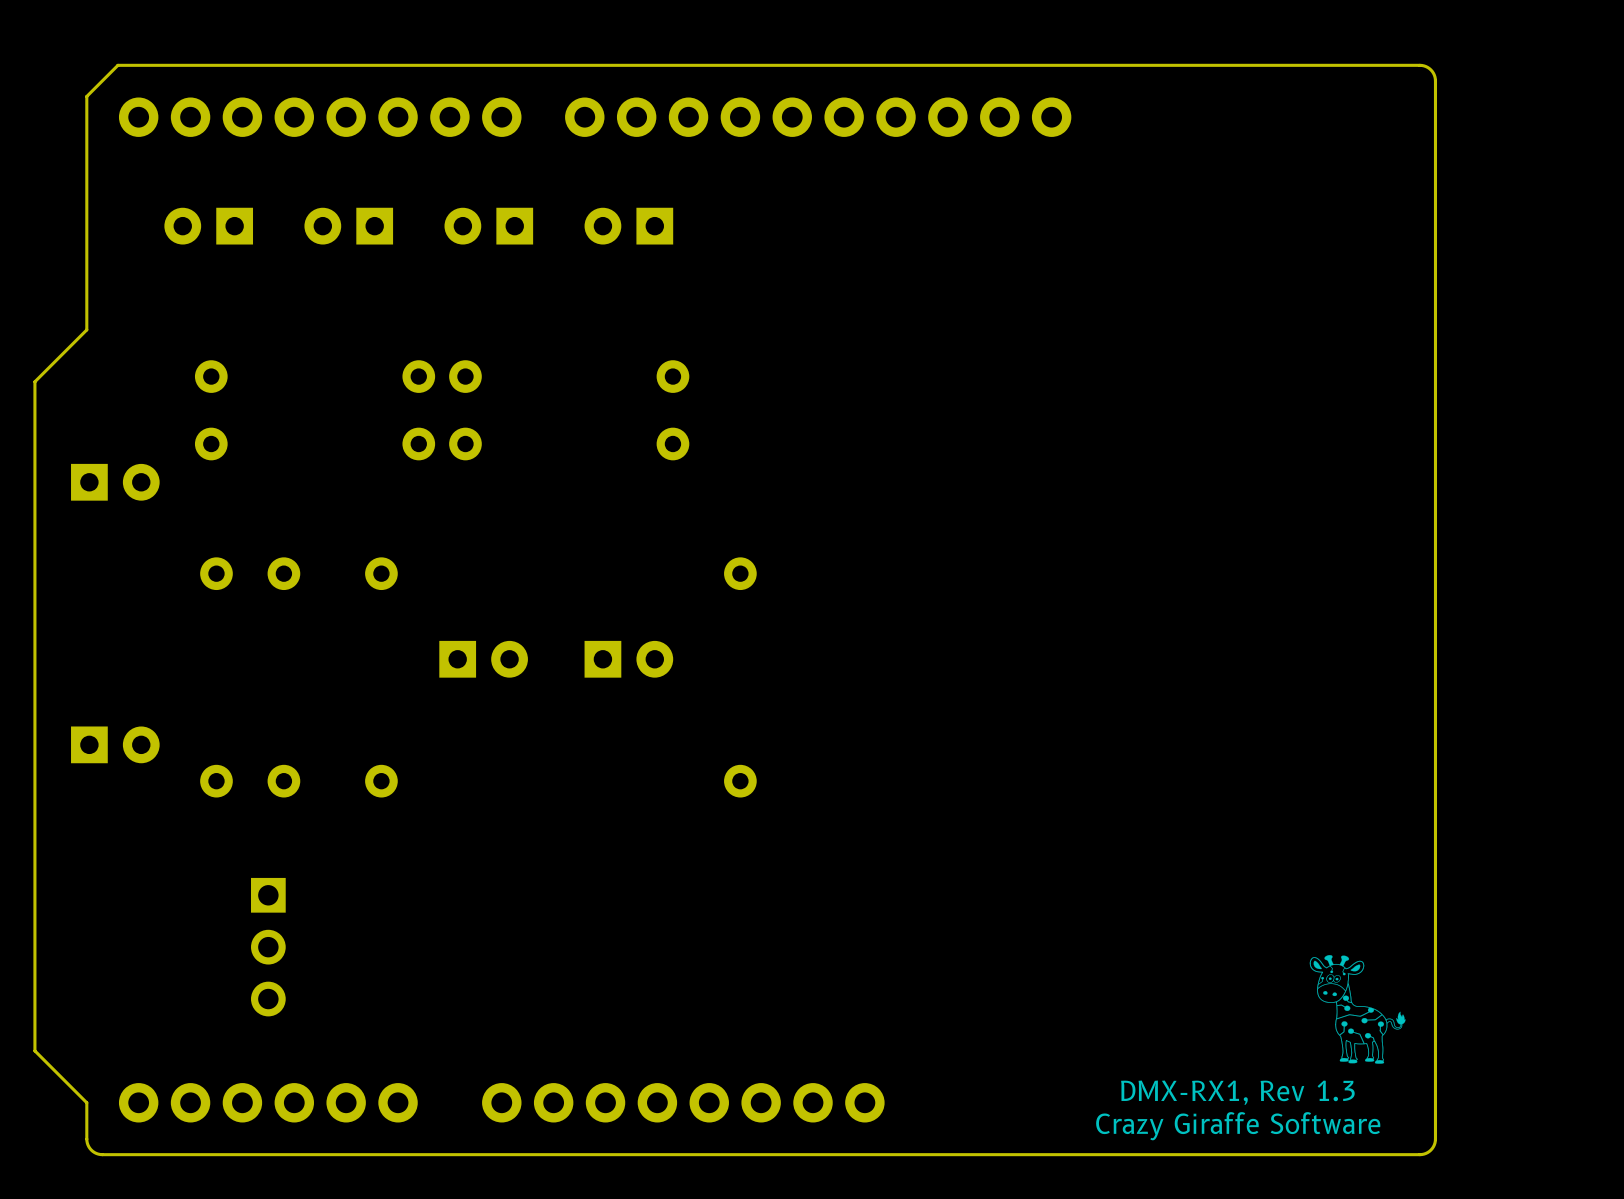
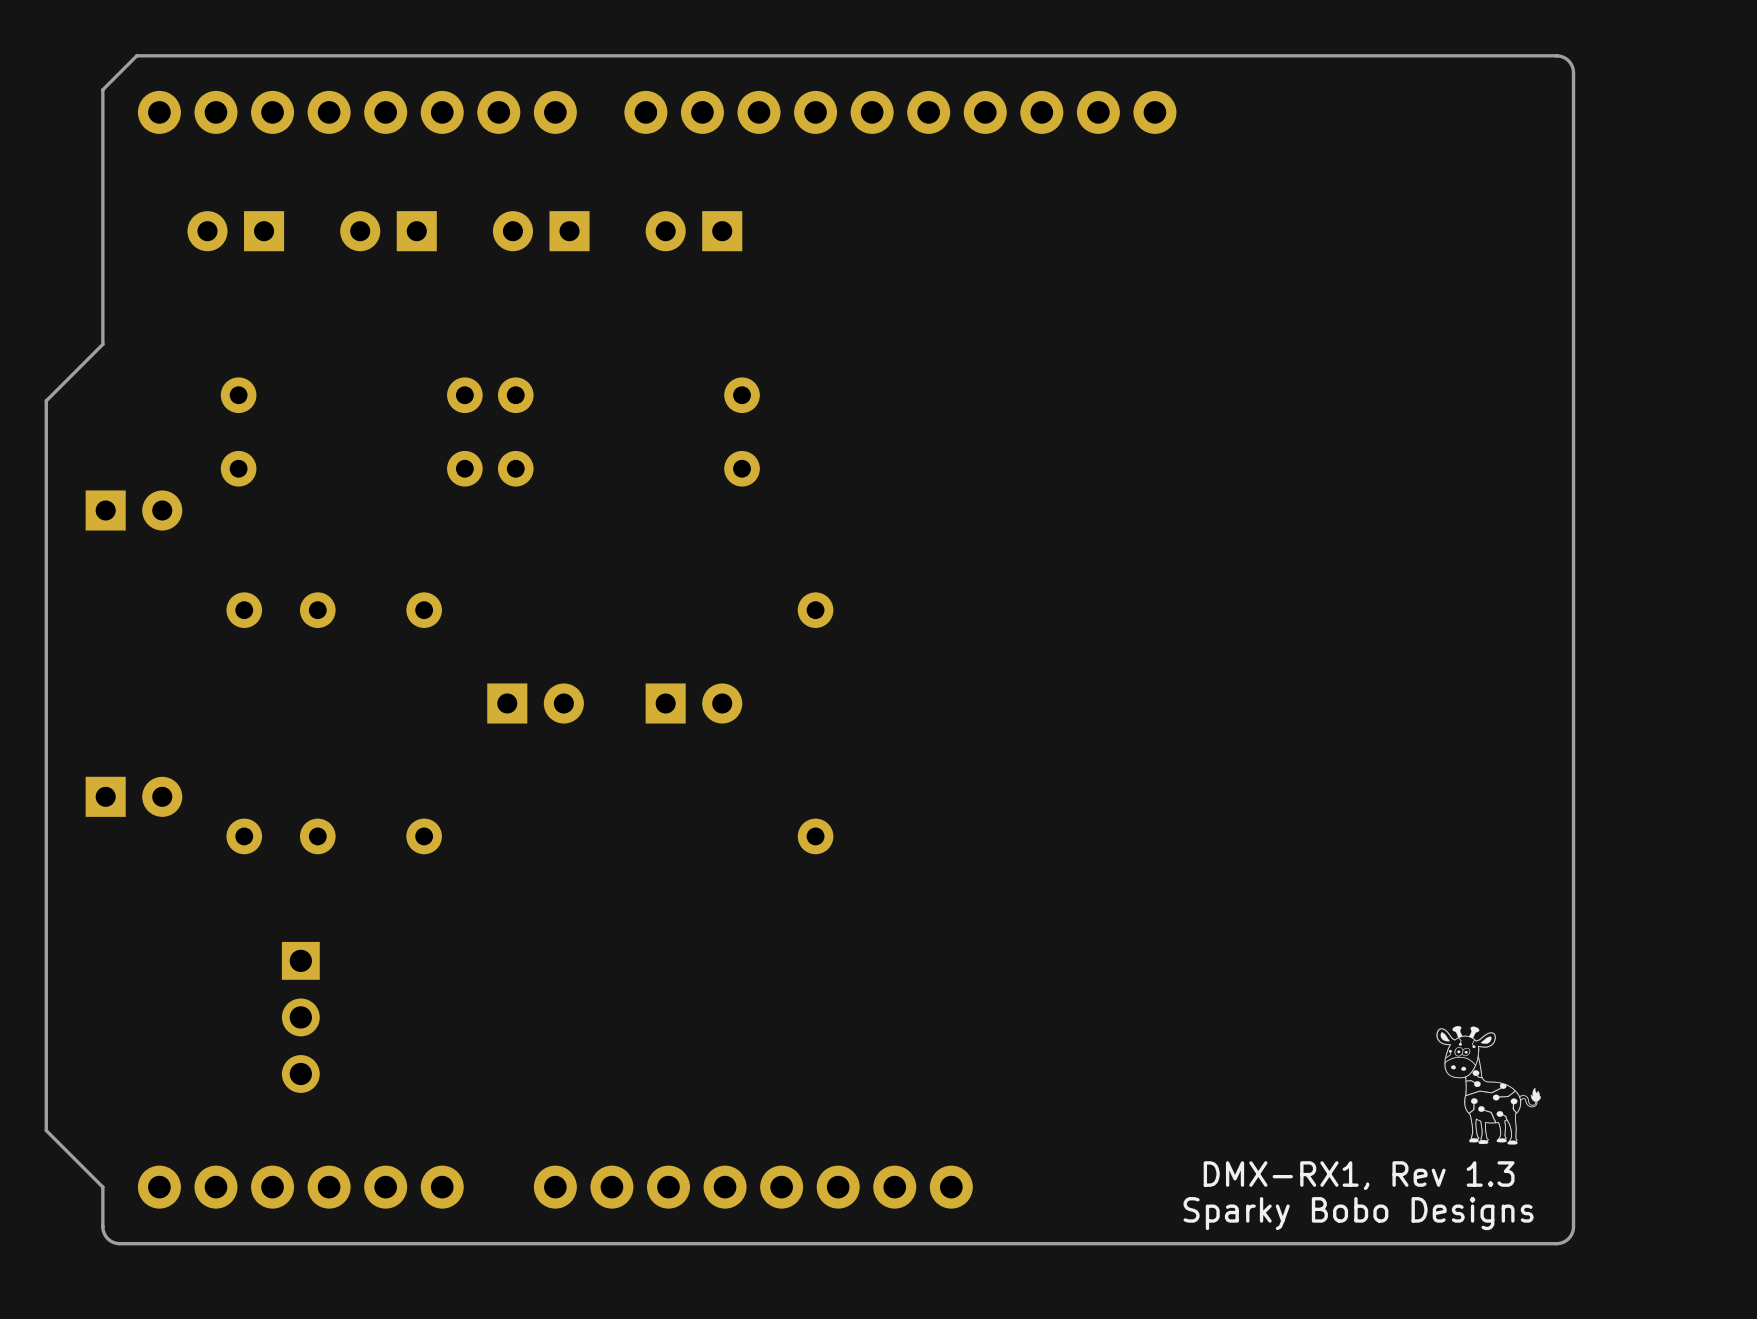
text: Crazy Giraffe Software (1238, 1126) -> Sparky Bobo Designs (1358, 1213)

